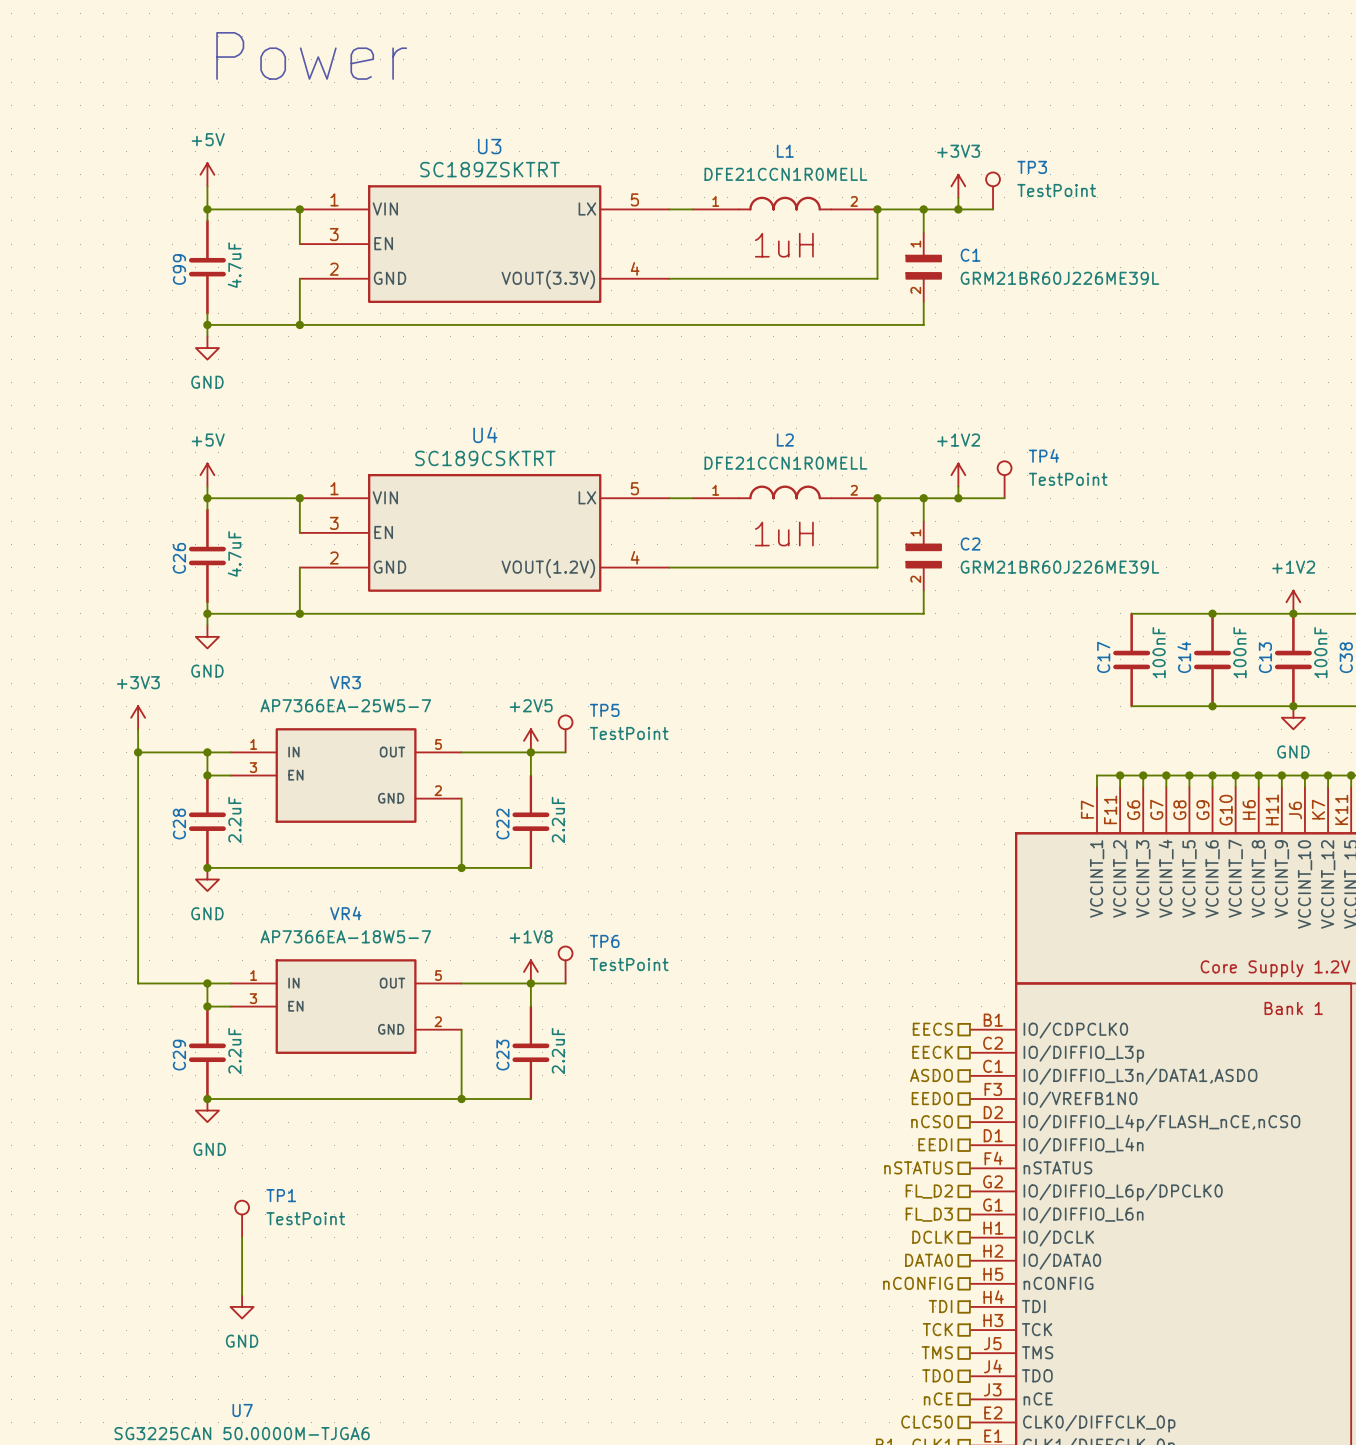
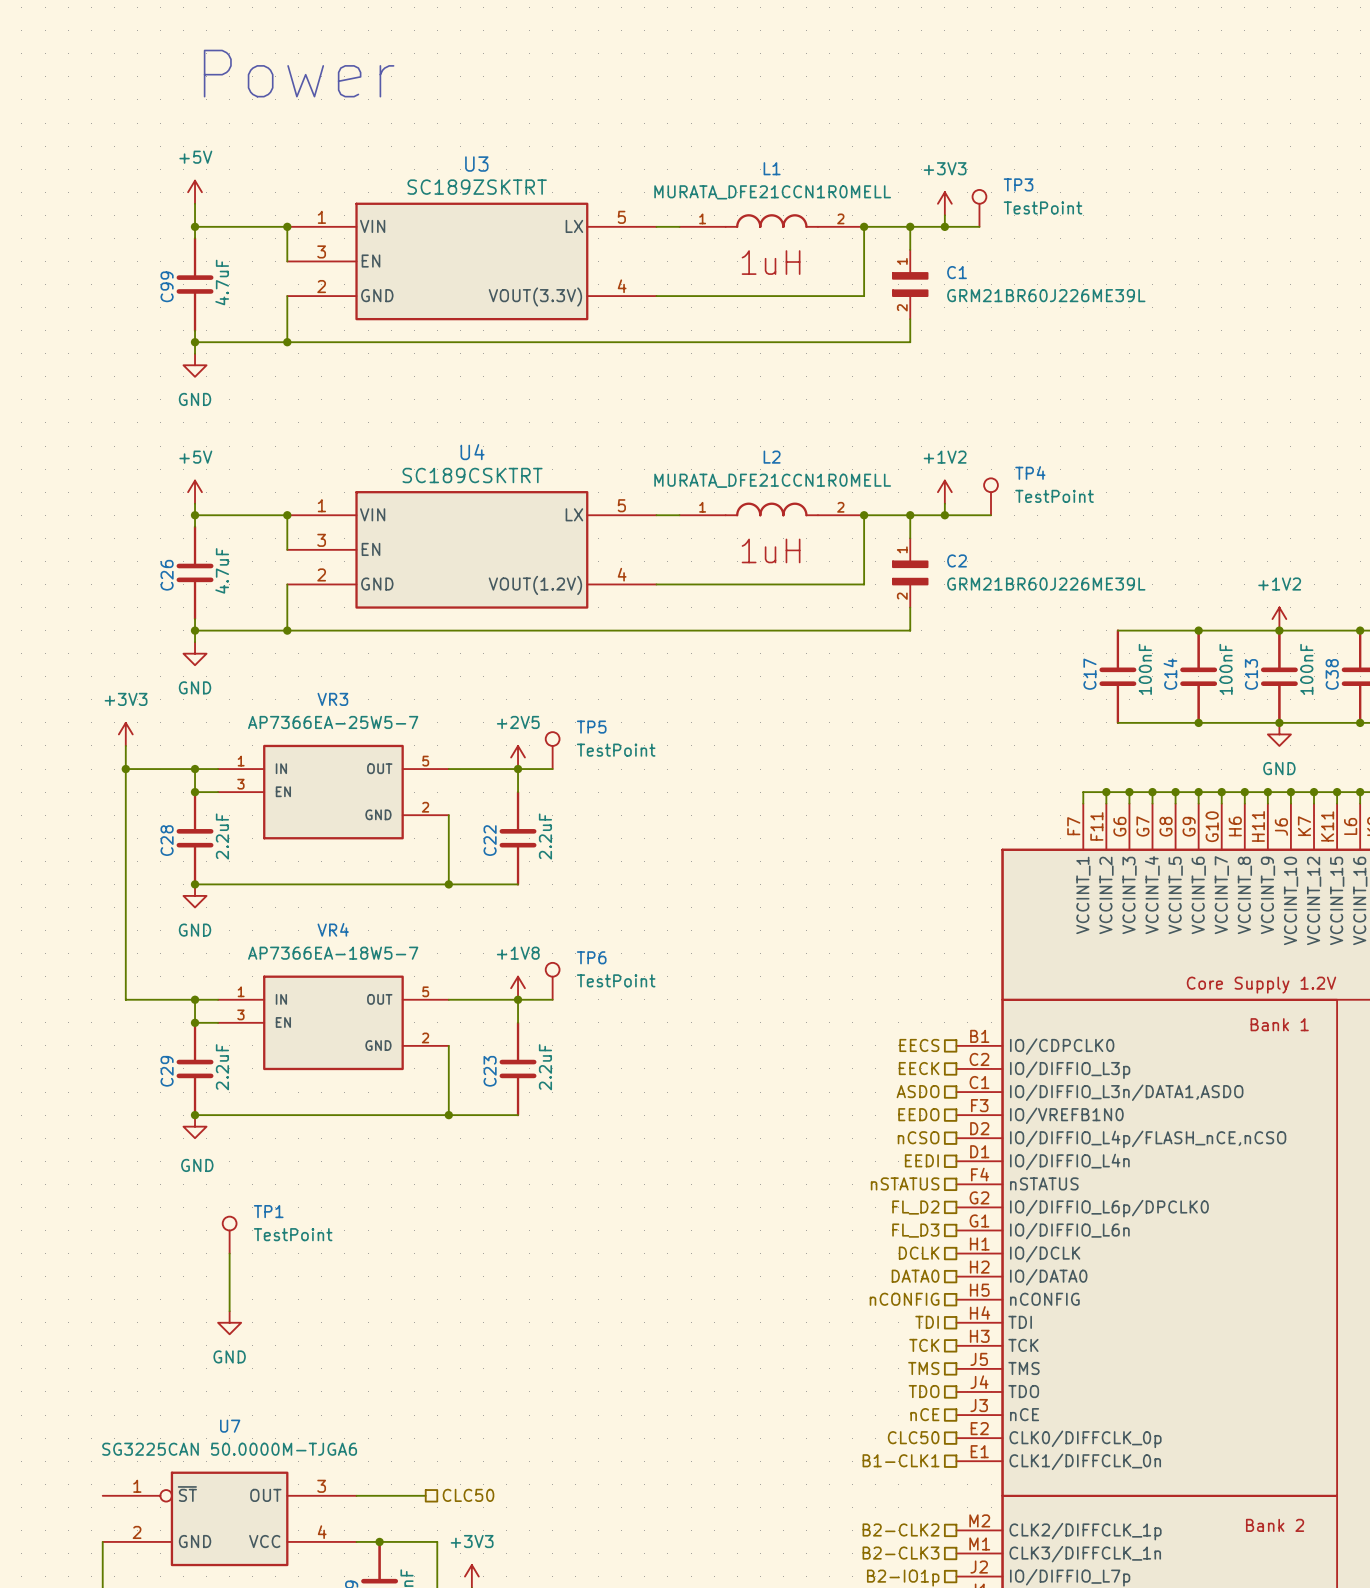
L1 value: DFE21CCN1R0MELL (785, 174) -> MURATA_DFE21CCN1R0MELL (772, 192)
L2 value: DFE21CCN1R0MELL (785, 463) -> MURATA_DFE21CCN1R0MELL (772, 480)

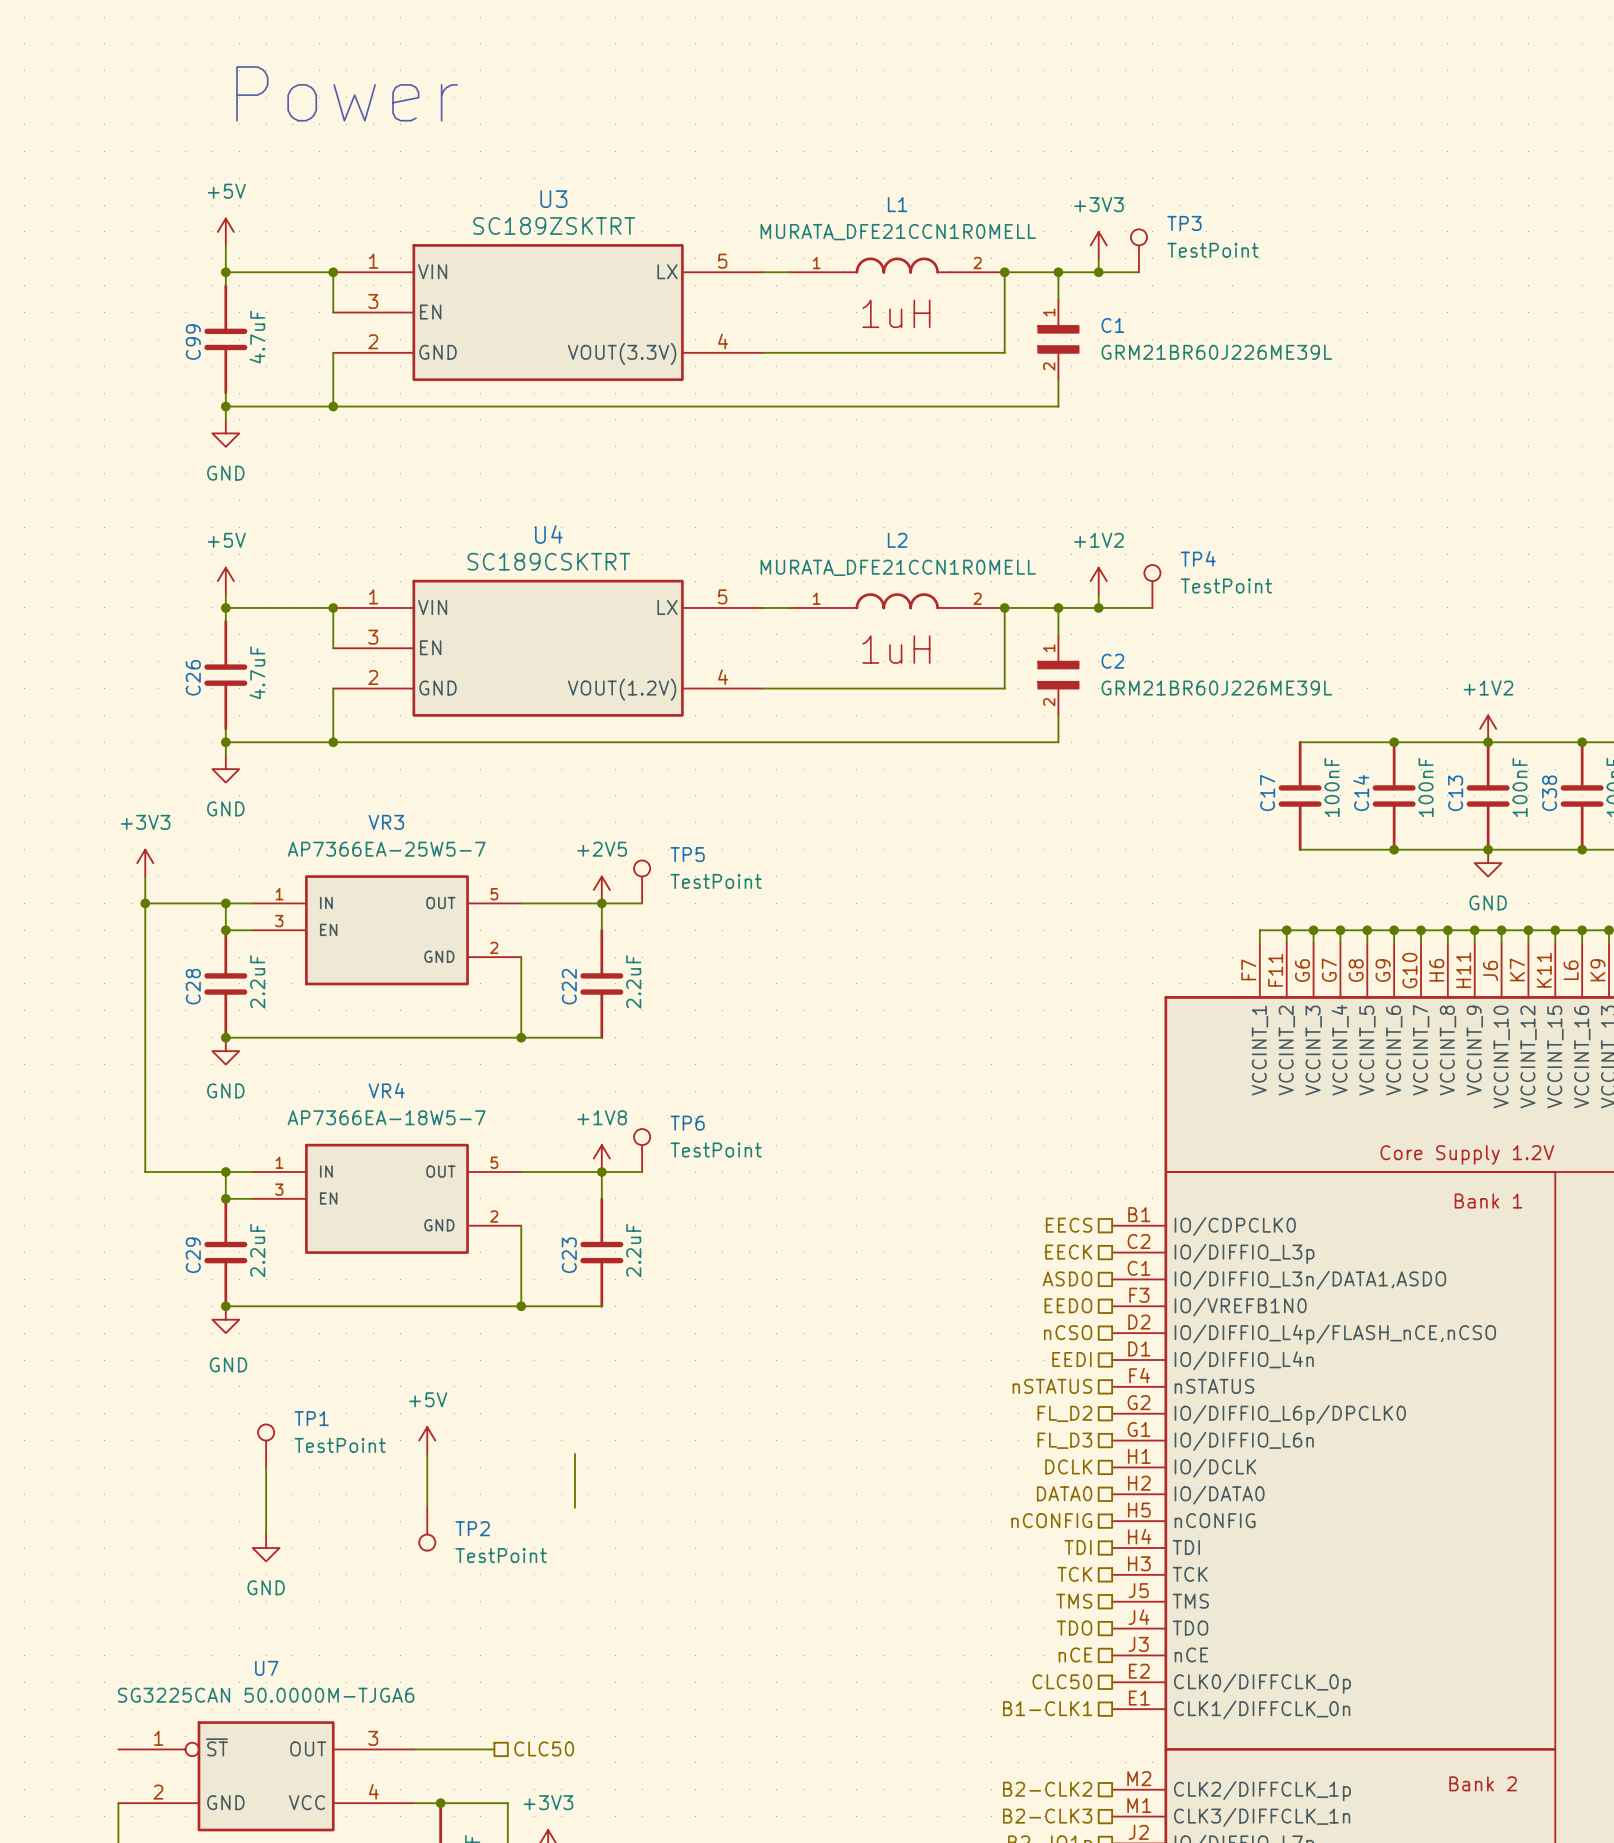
power symbol: none -> +5V (427, 1440)
wire: none -> (427, 1454) (427, 1507)
wire: none -> (574, 1454) (574, 1507)
TP2: none -> TestPoint (427, 1529)

